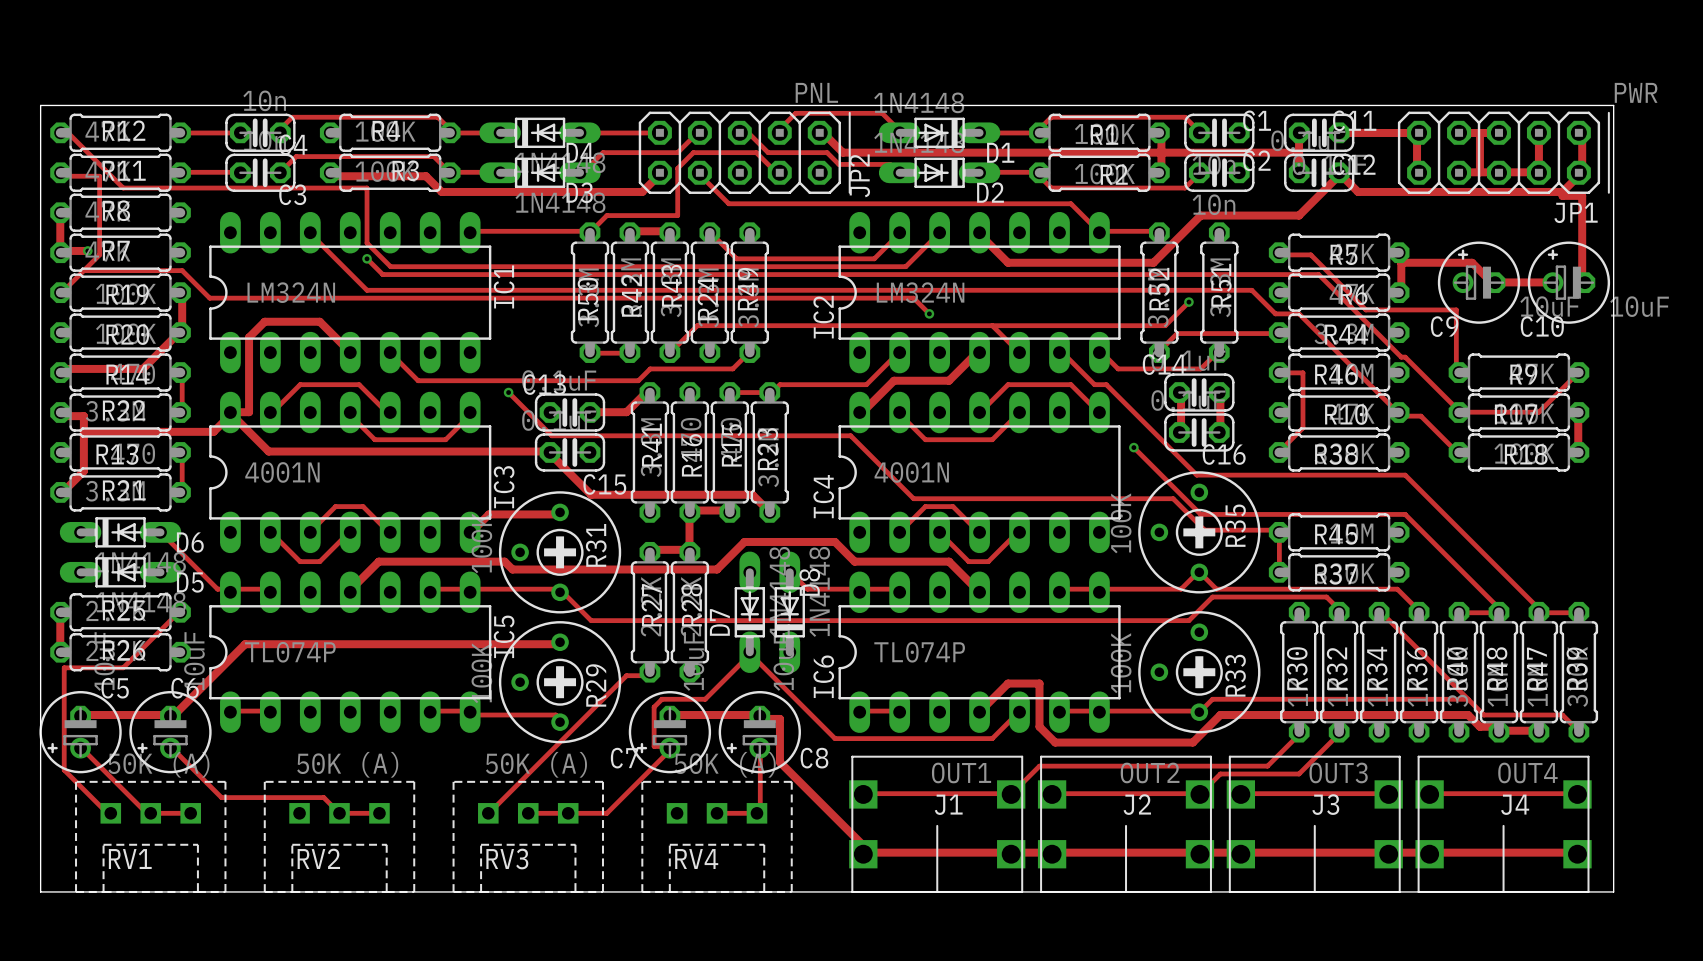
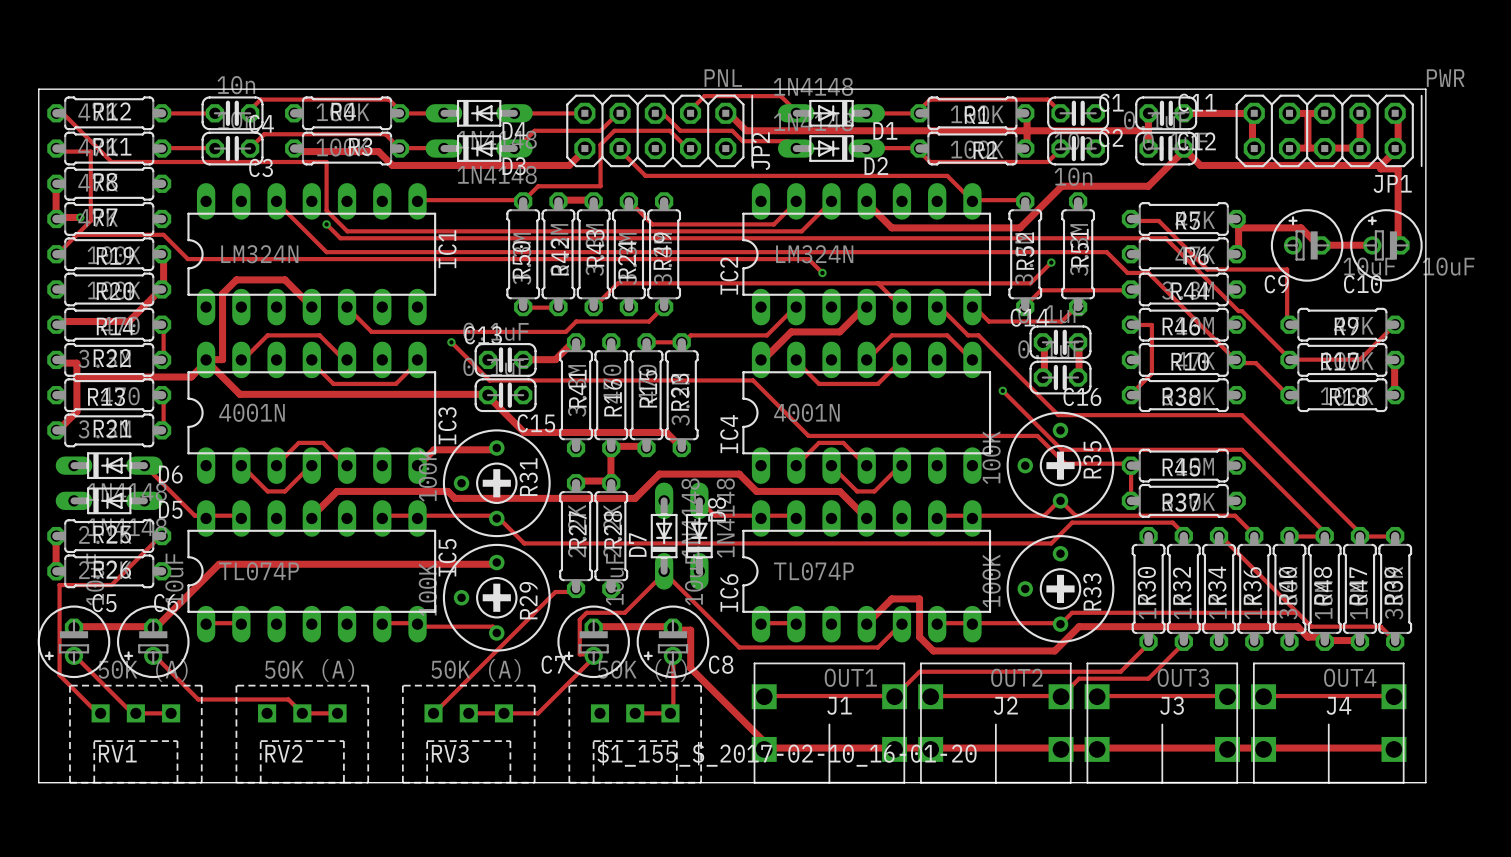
RV4 name: RV4 (696, 859) -> $1_155_$_2017-02-10_16-01-20 (786, 754)

